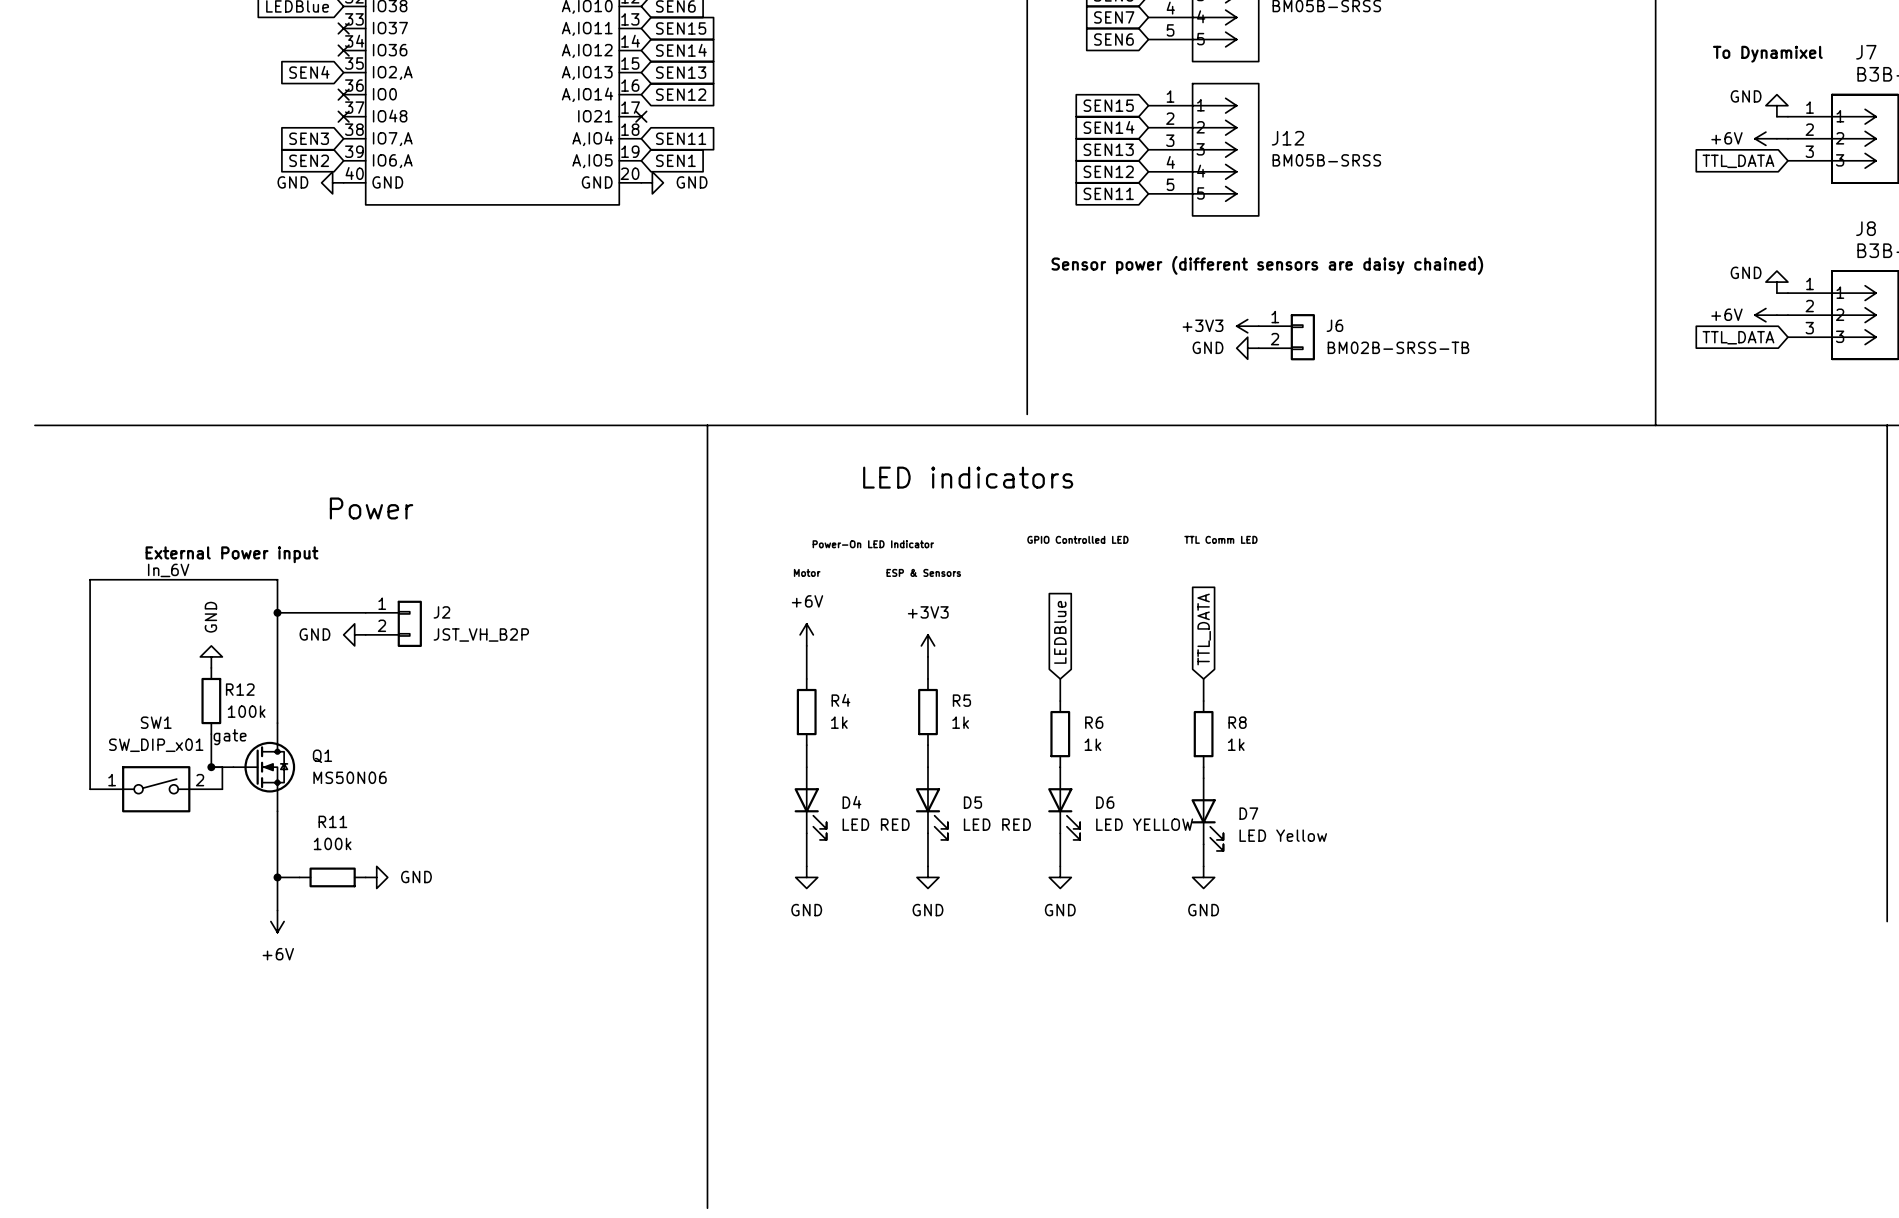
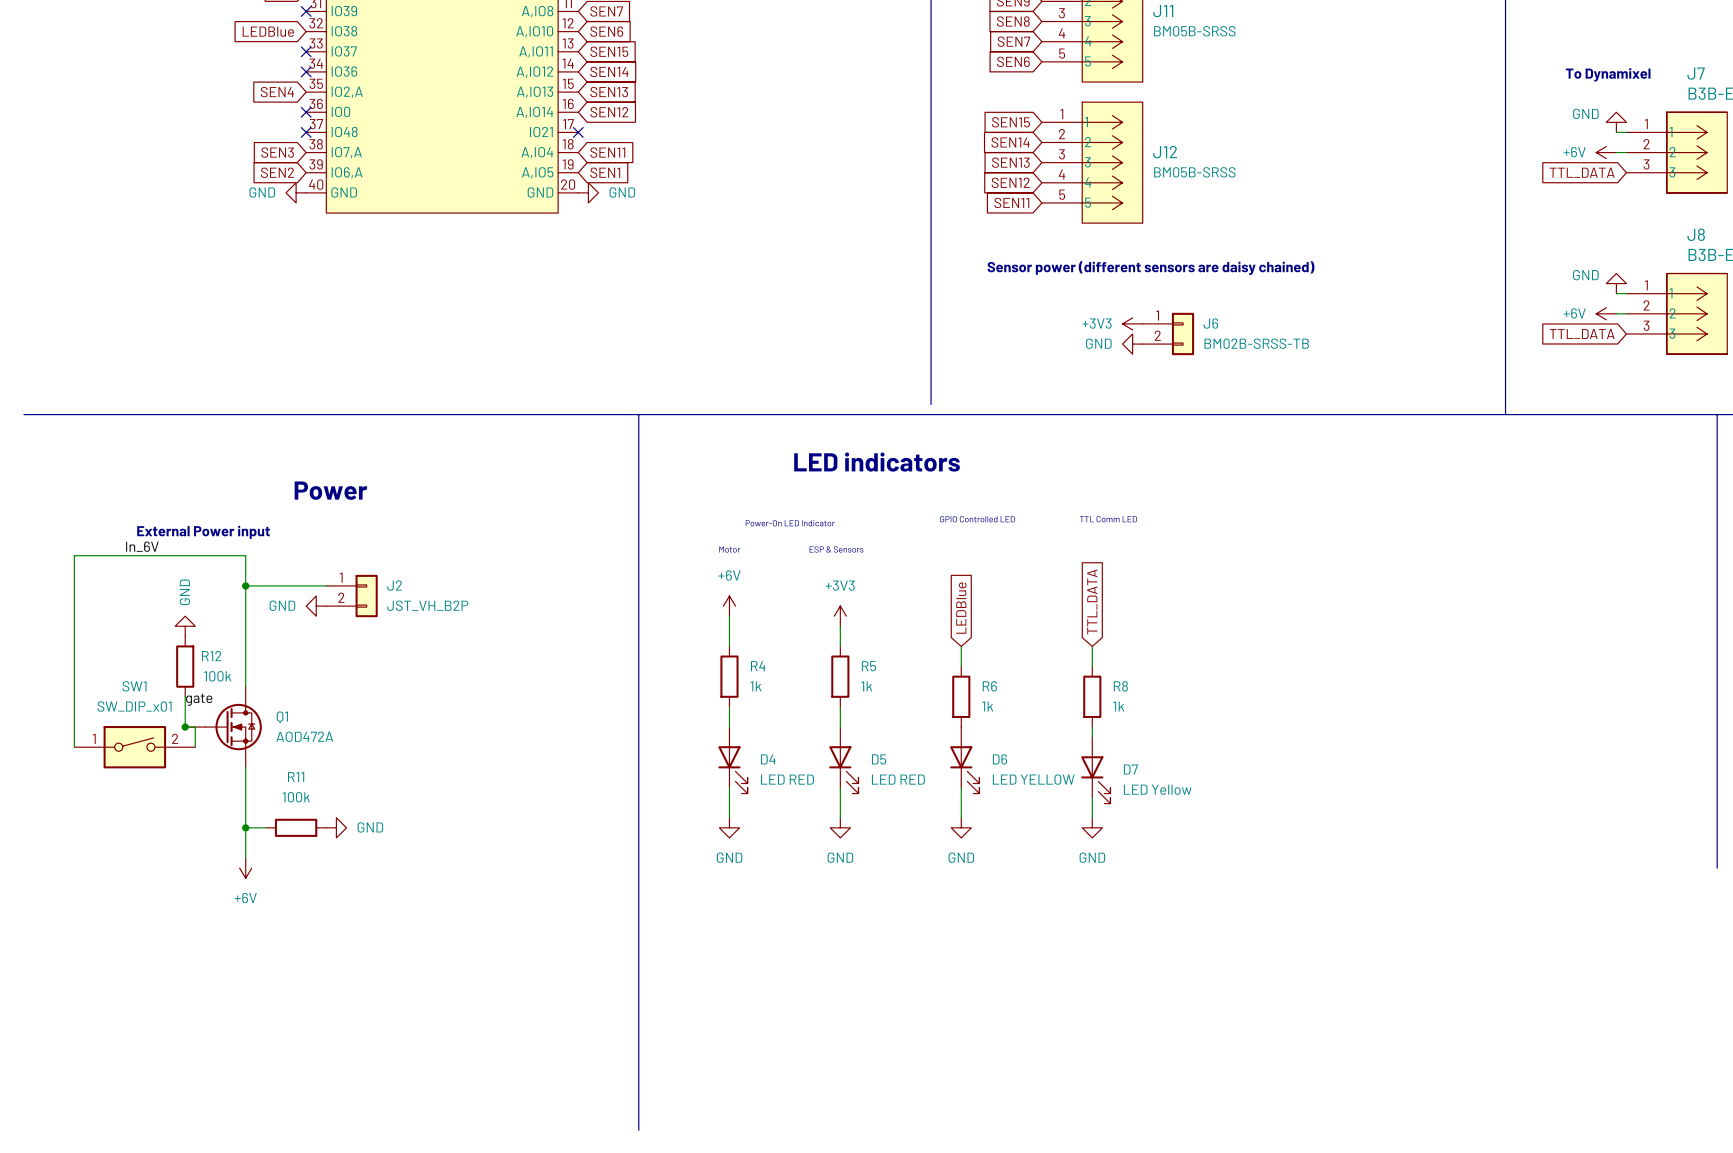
Q1 value: MS50N06 (350, 777) -> AOD472A (304, 736)

